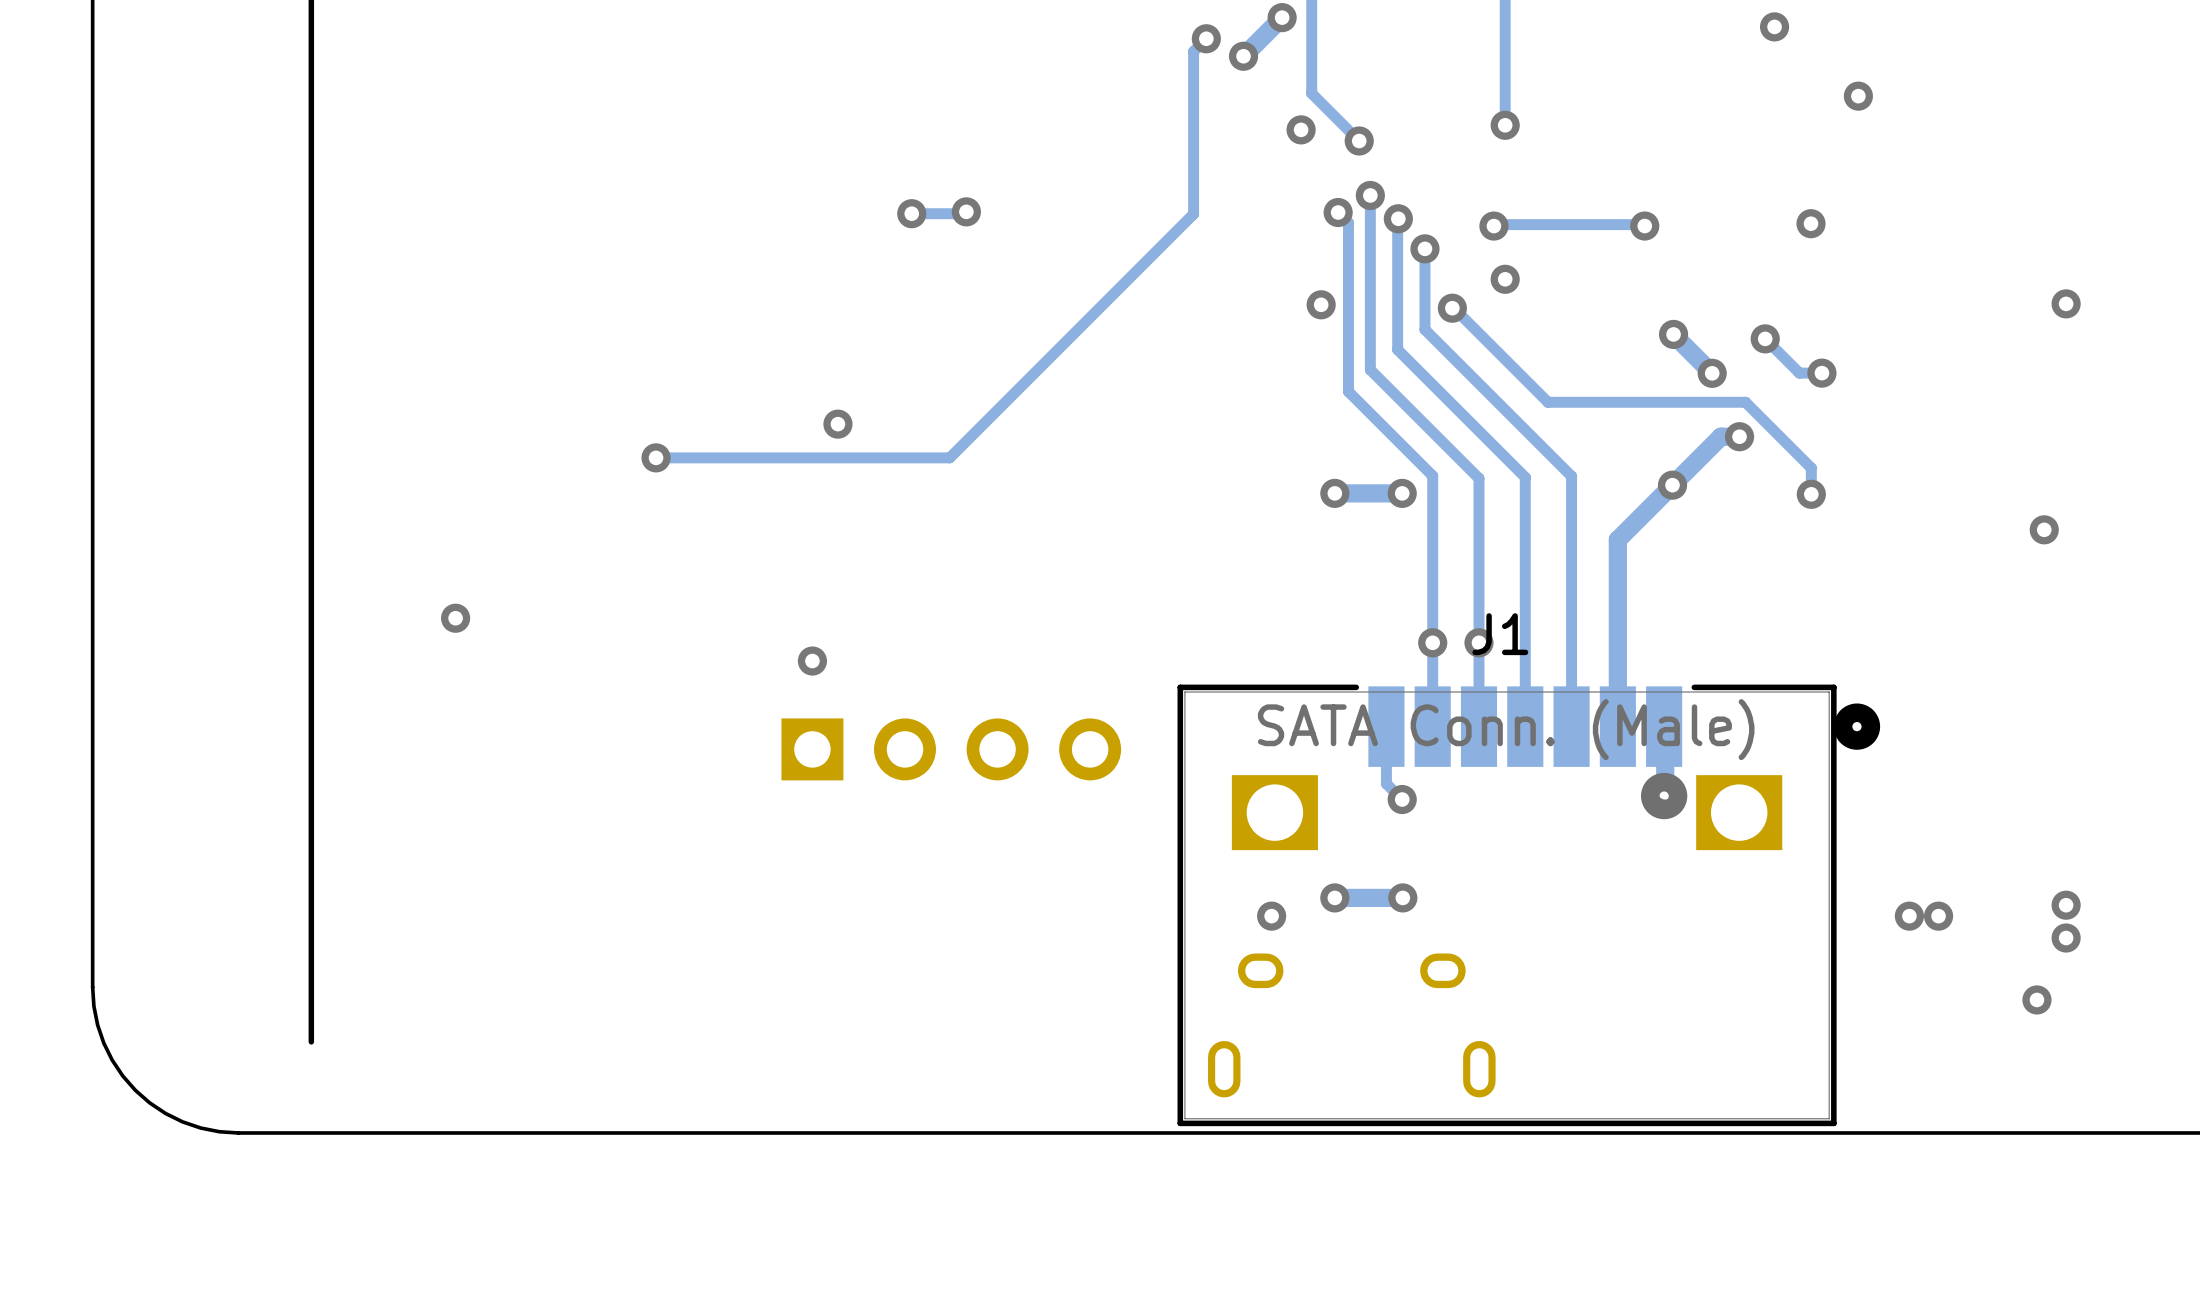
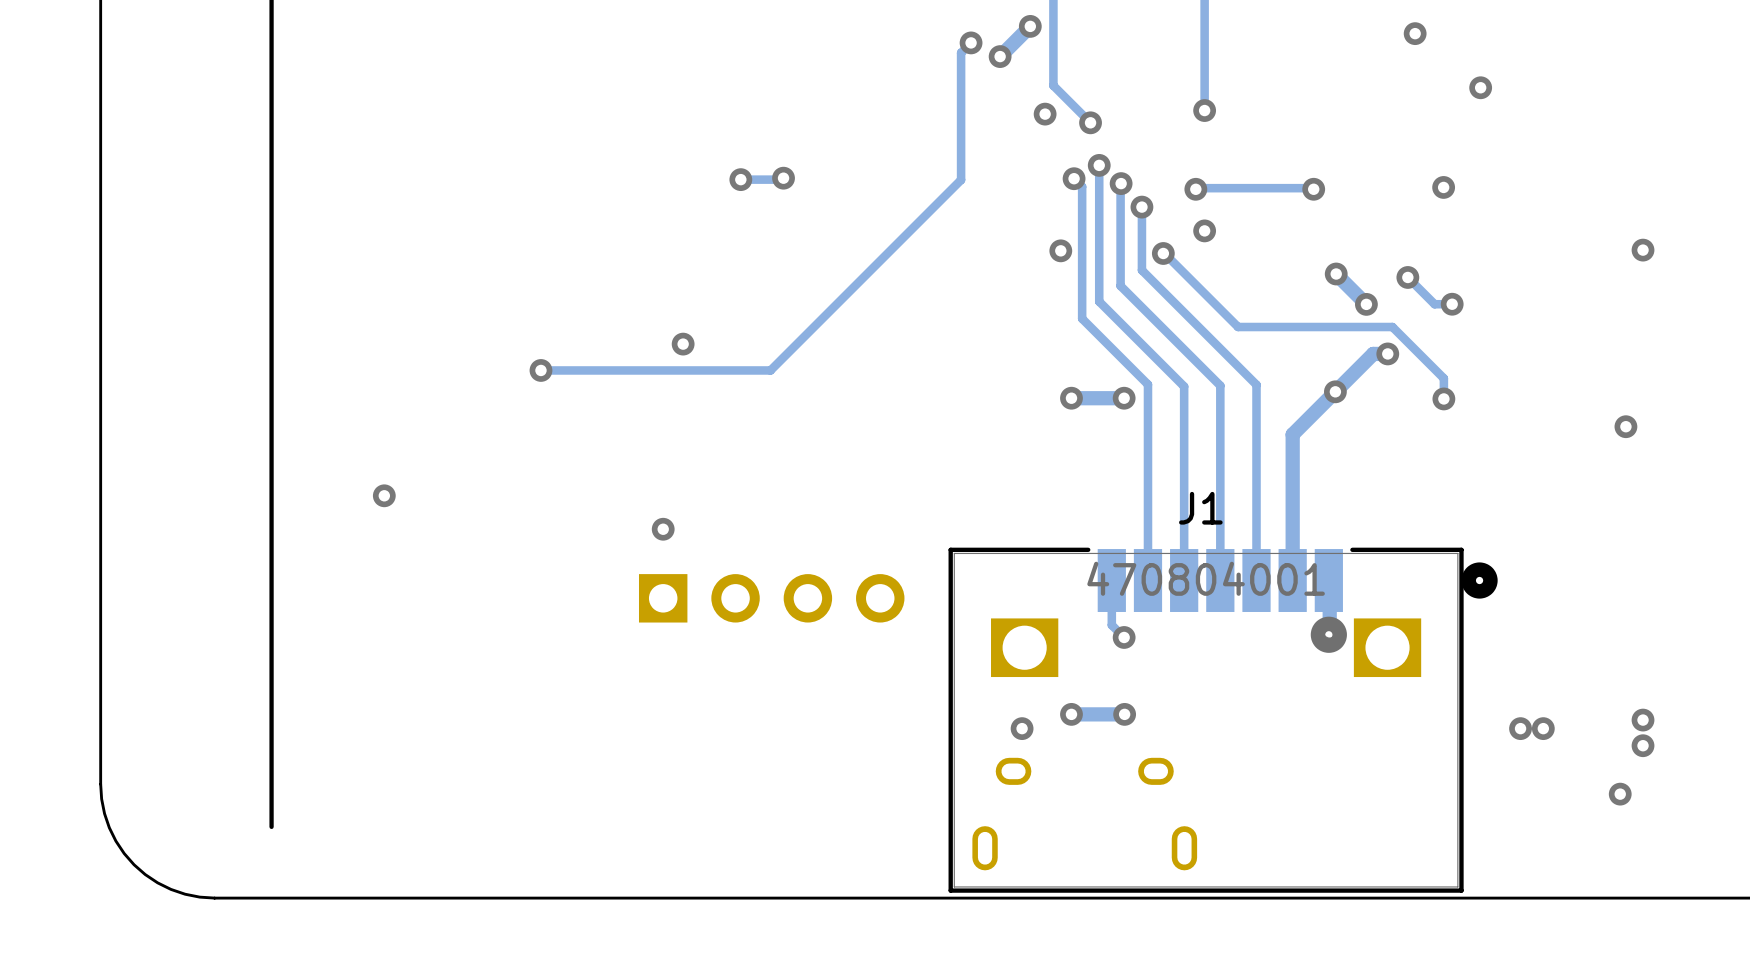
via: (1432, 642) -> none
via: (1479, 642) -> none
J1 value: SATA Conn. (Male) (1506, 729) -> 470804001 (1206, 578)

